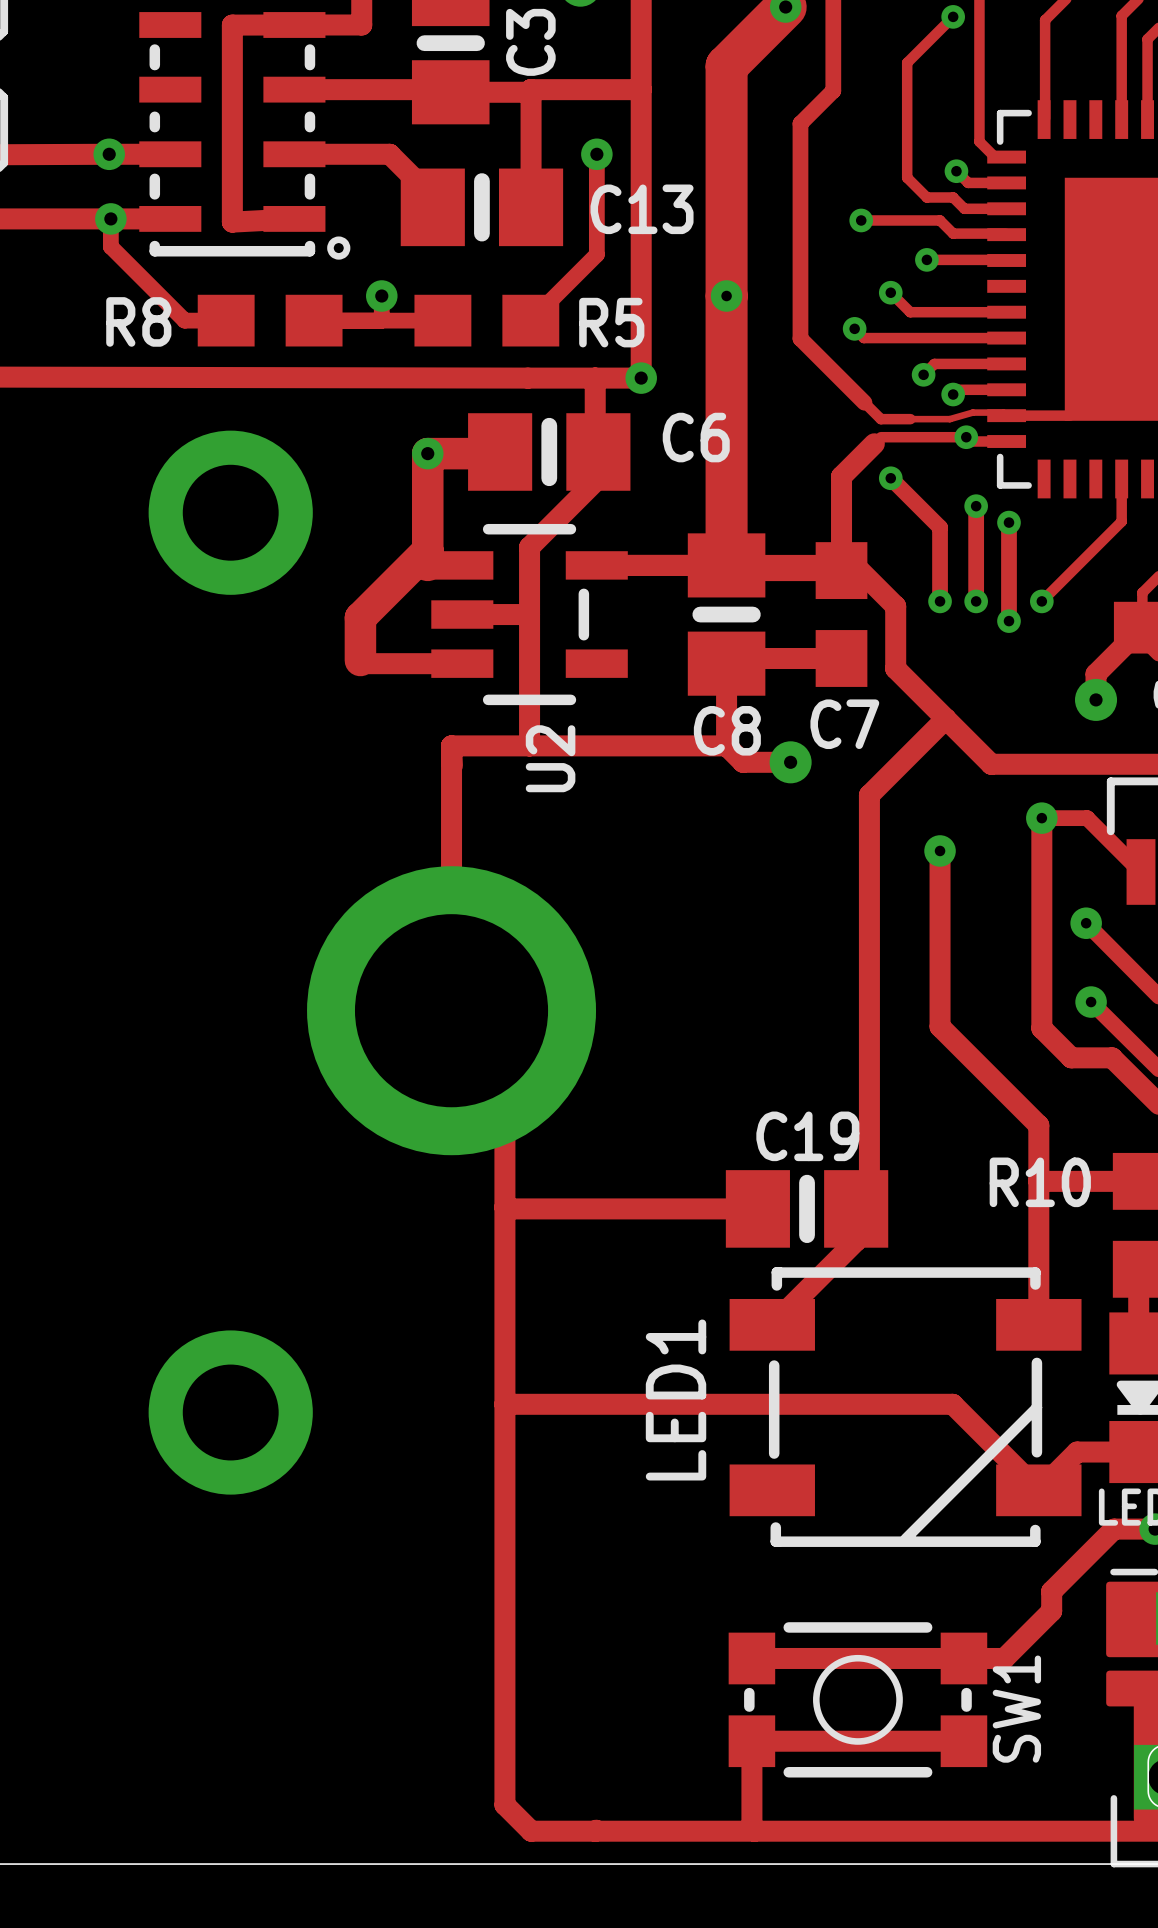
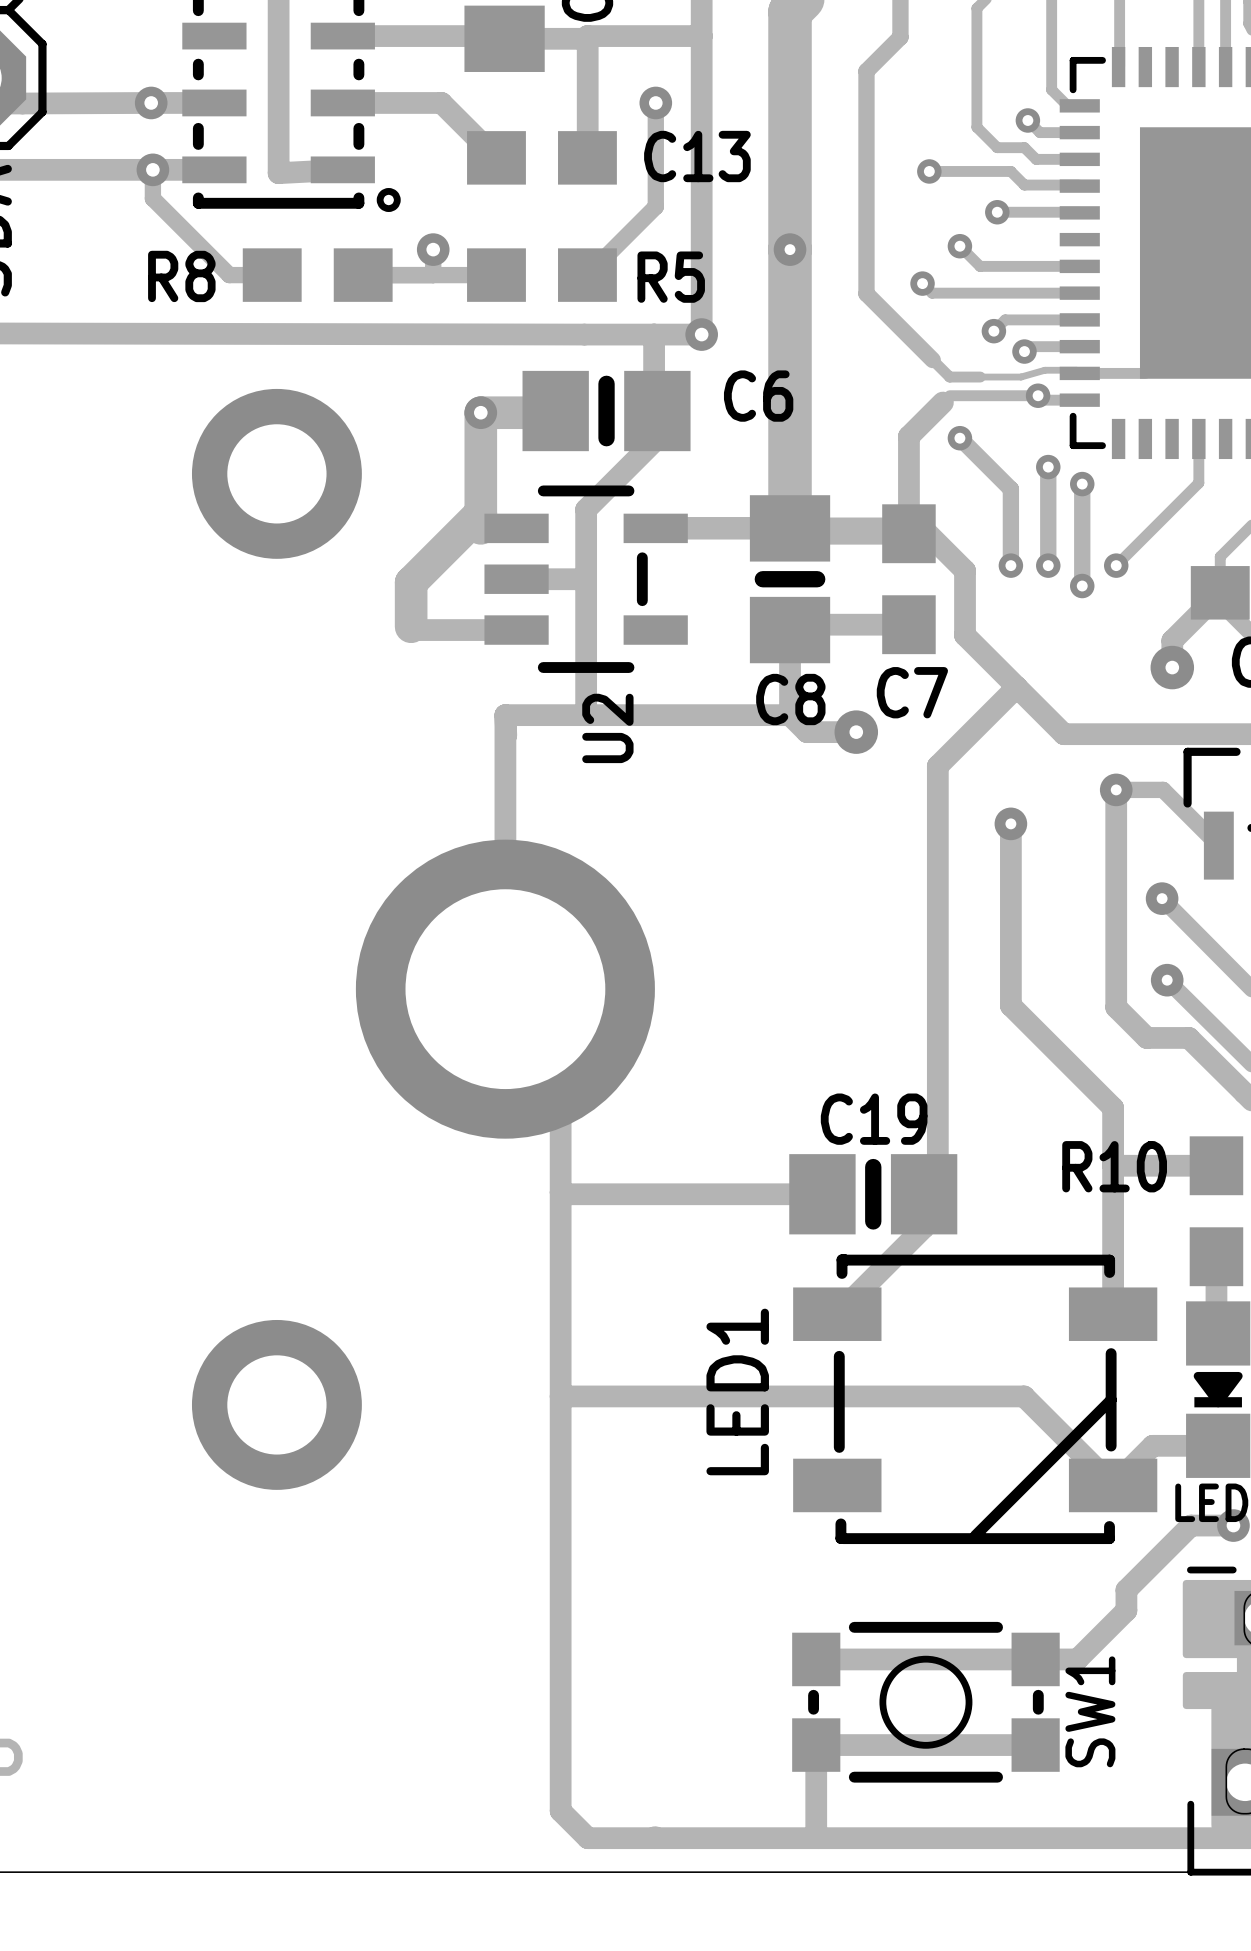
C13 footprint: [400, 168, 564, 247] -> [467, 131, 617, 185]

